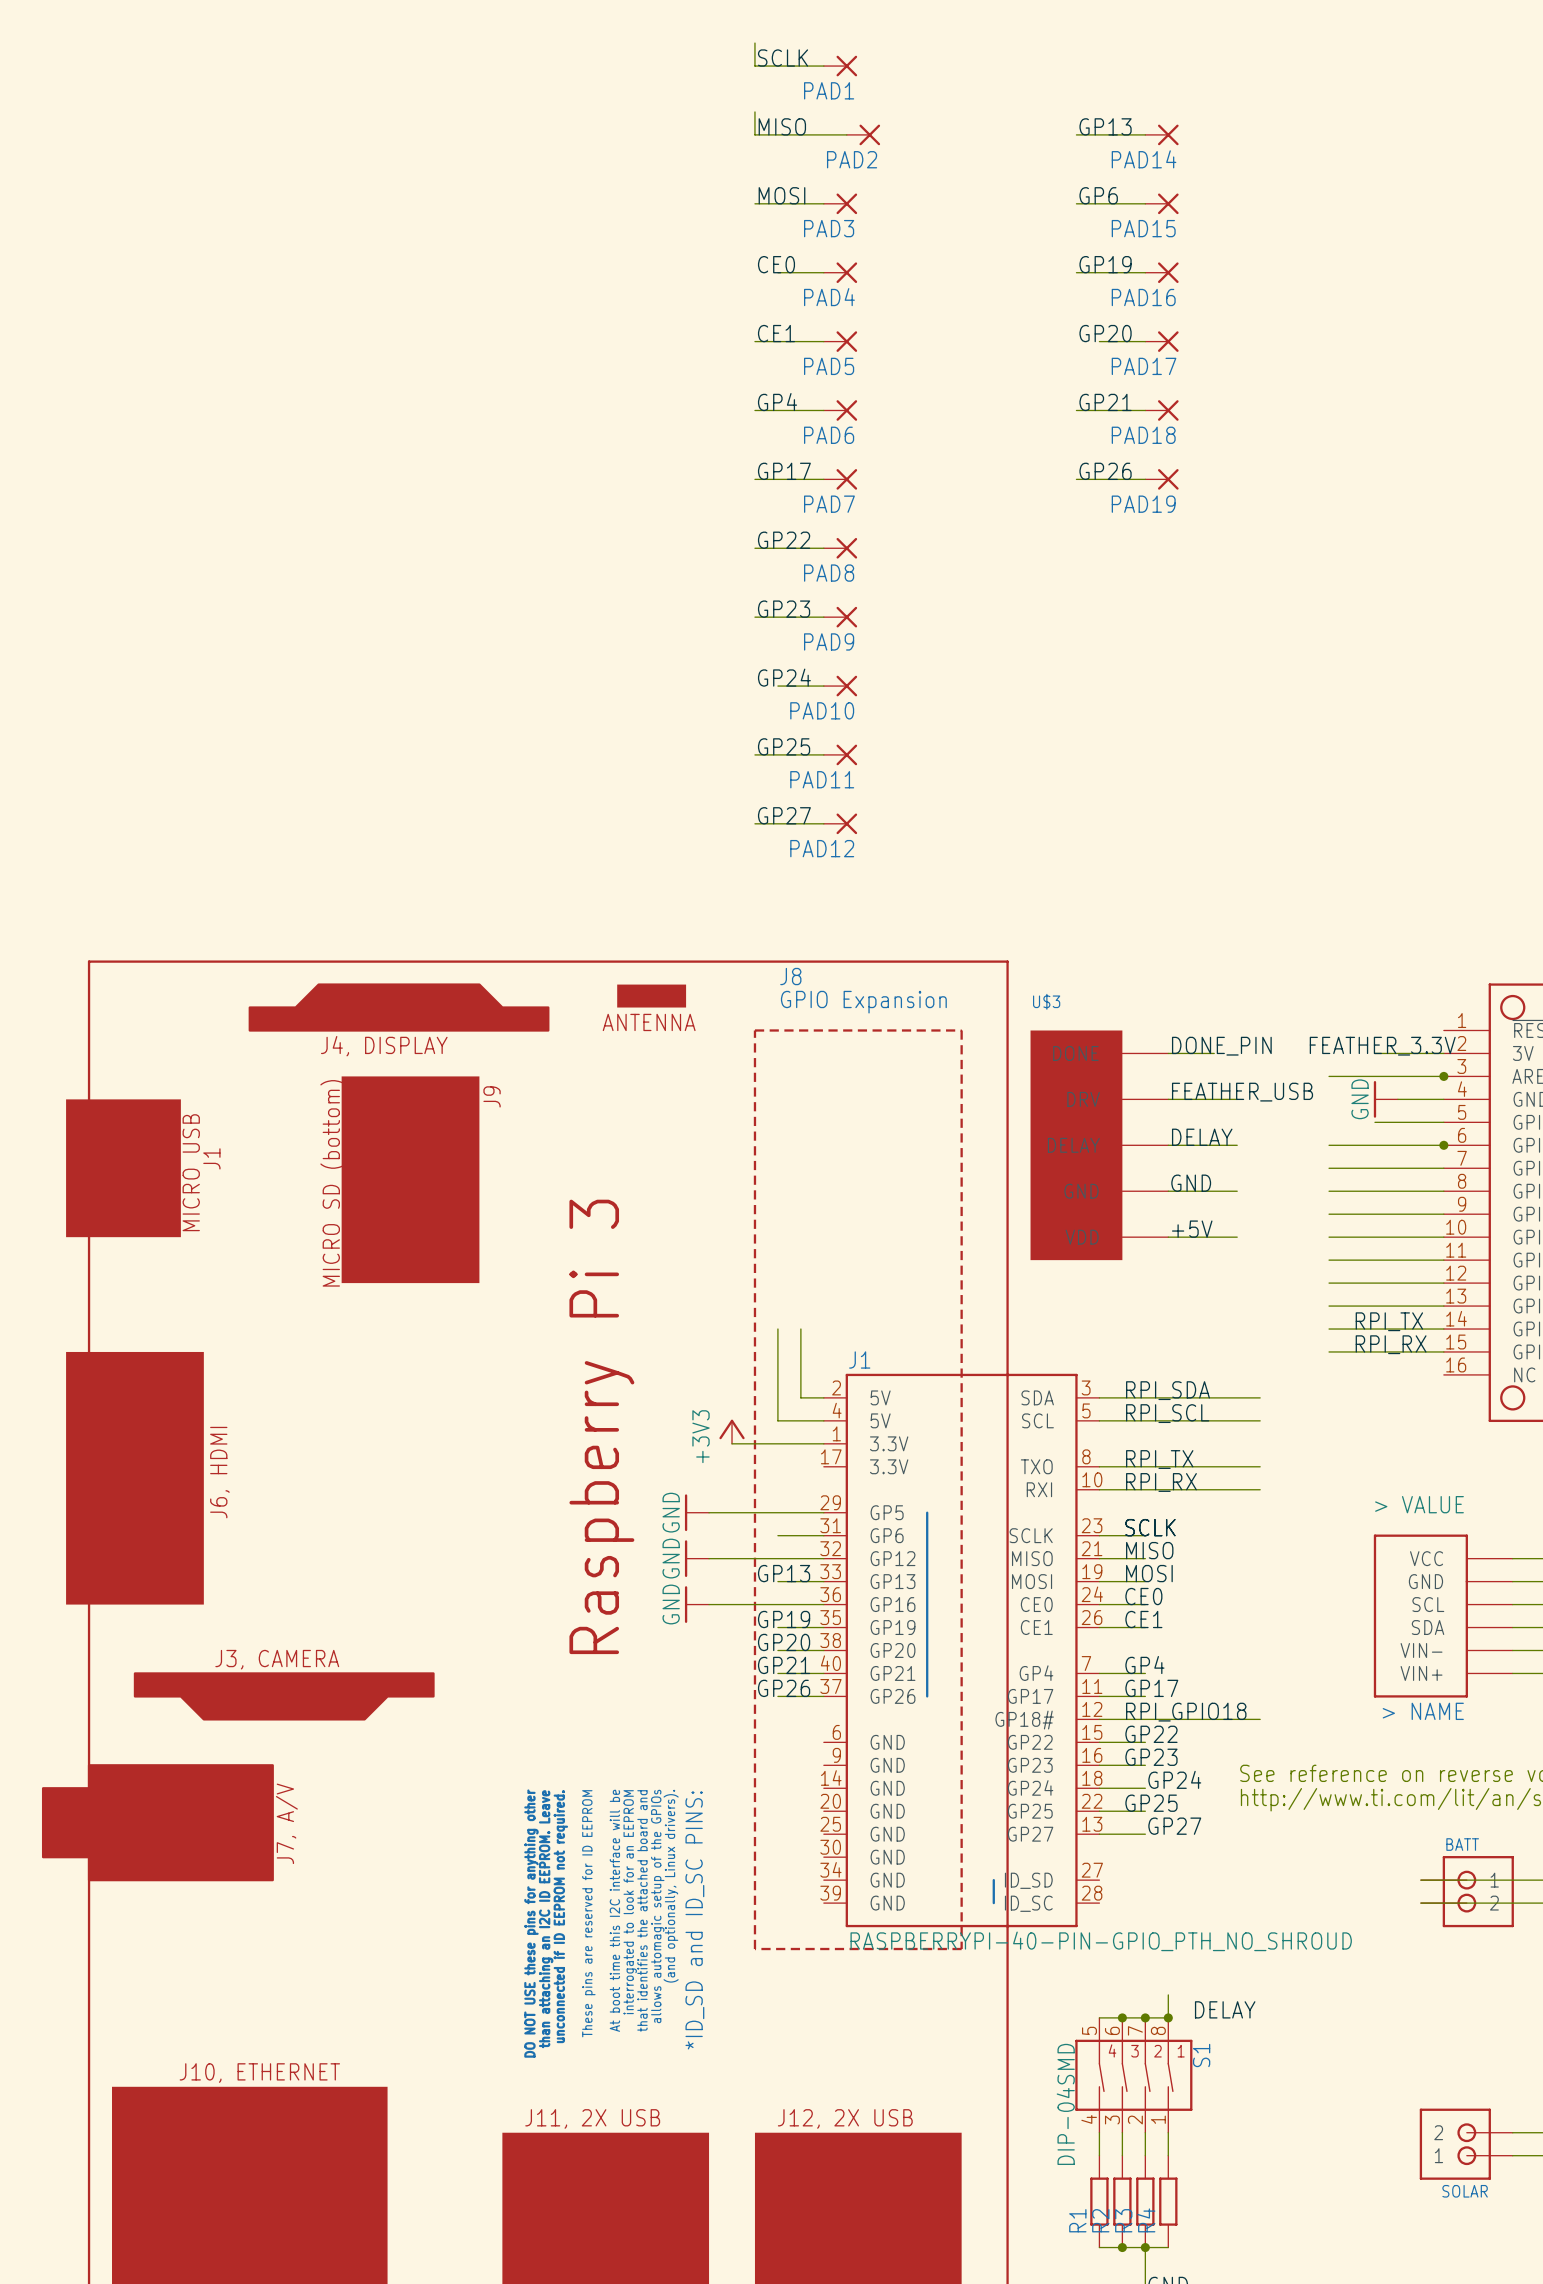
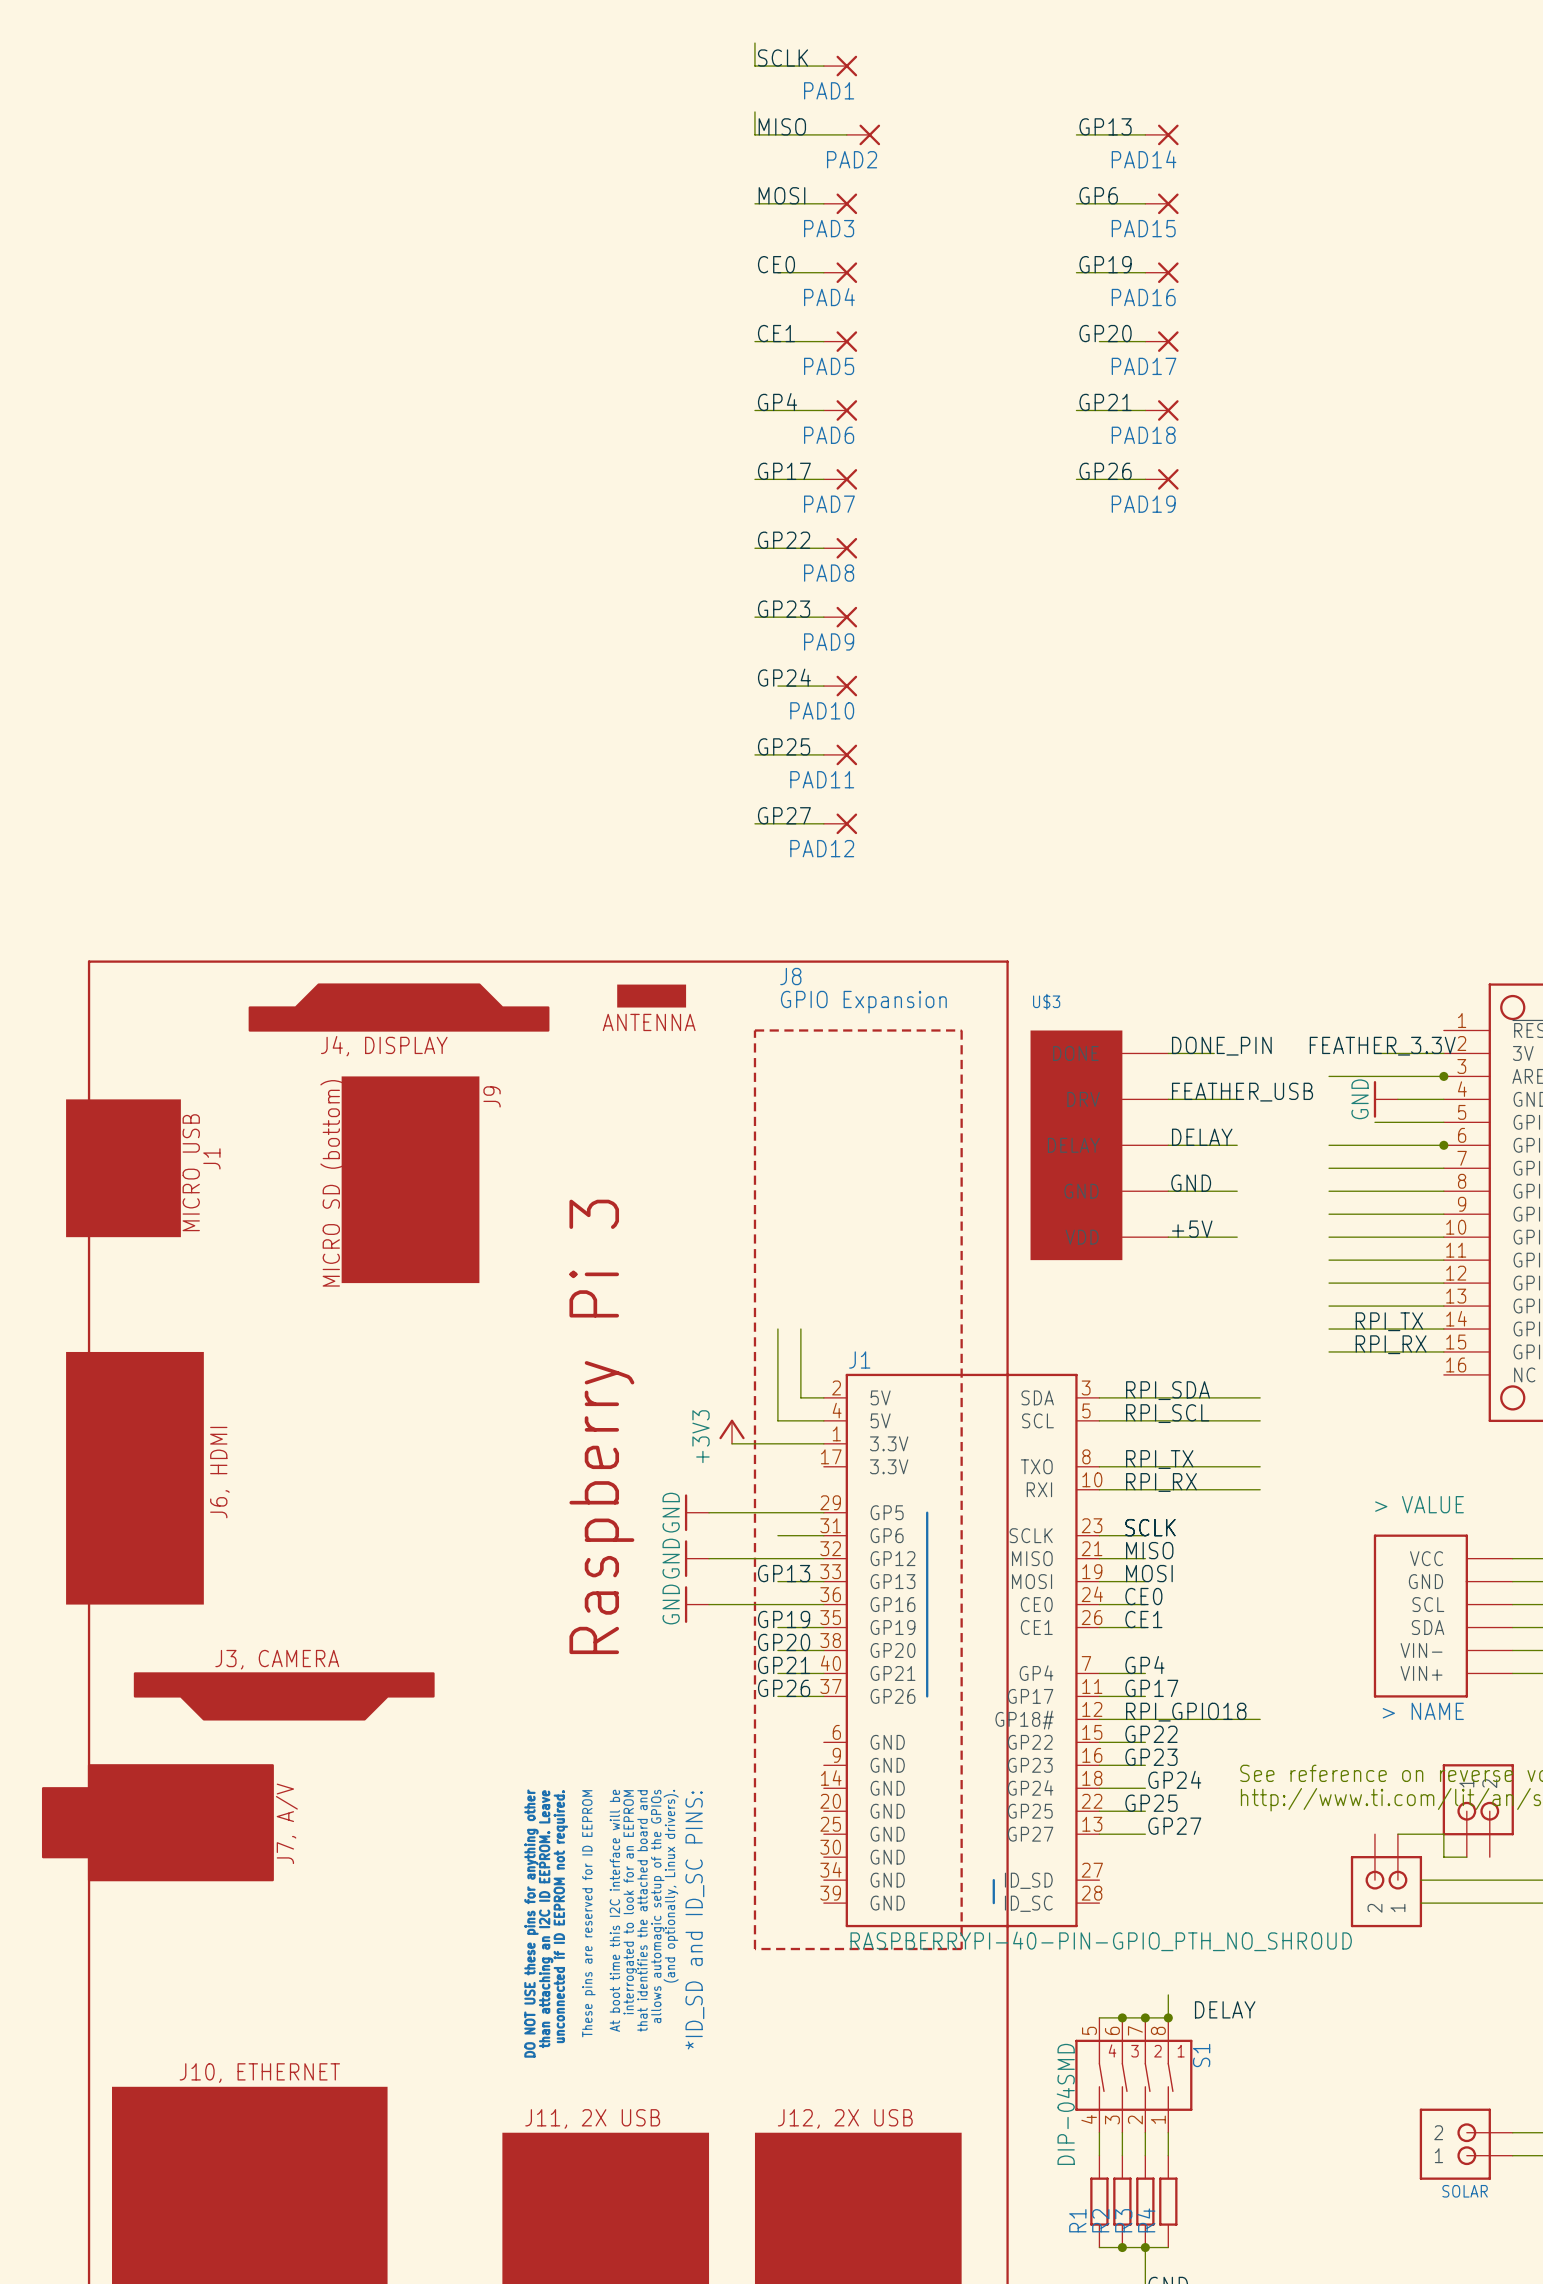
part: none -> (1478, 1810)
wire: none -> (1397, 1834) (1443, 1834) (1443, 1857) (1466, 1857)
part: none -> (1386, 1880)
BATT: (1467, 1891) -> none

